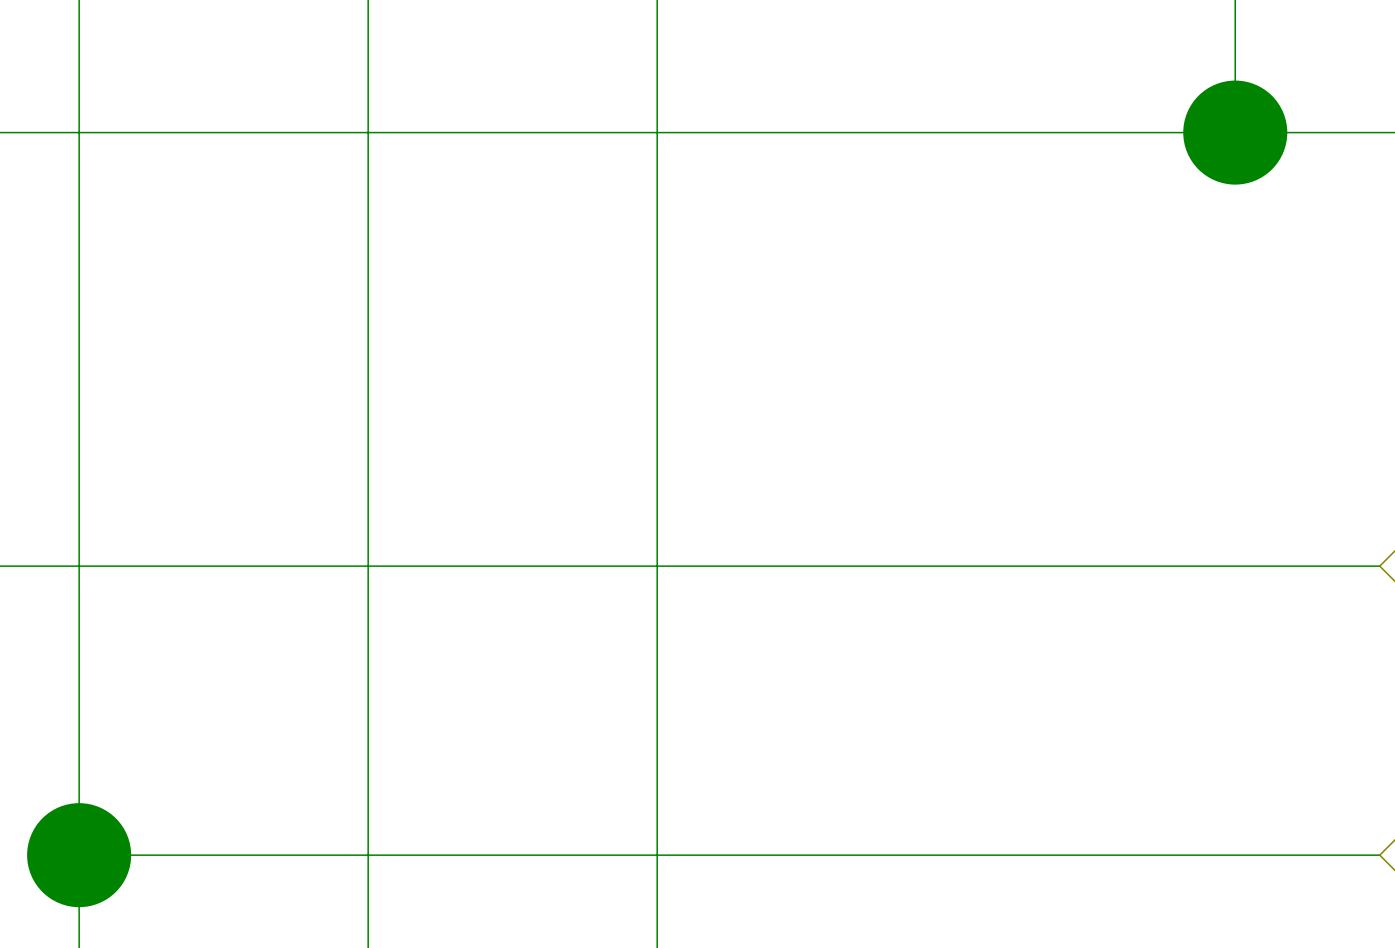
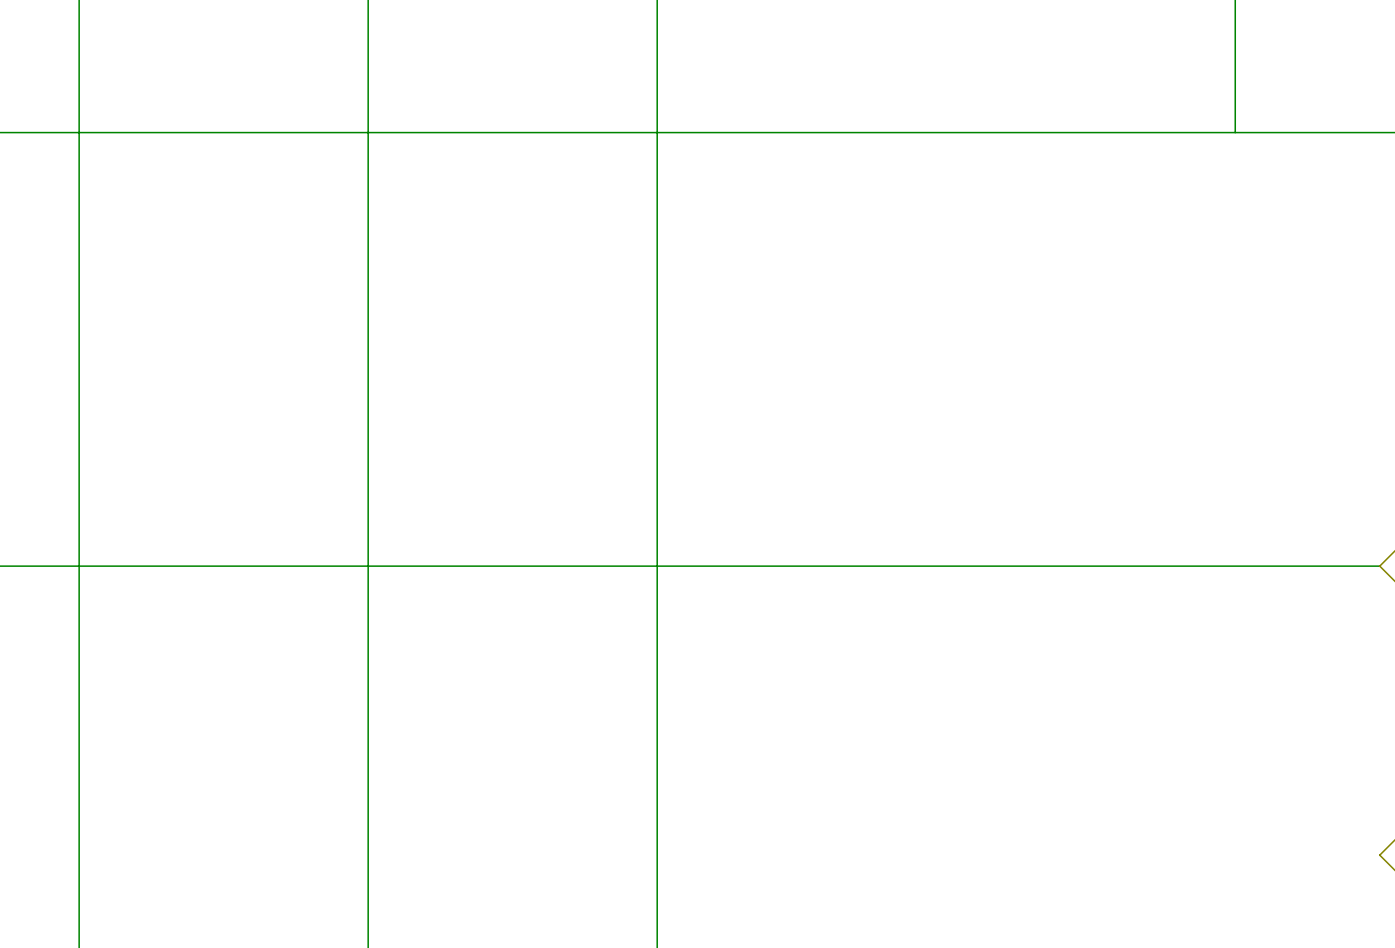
junction: (1235, 132) -> none
wire: (79, 855) (1379, 855) -> none
junction: (79, 855) -> none

